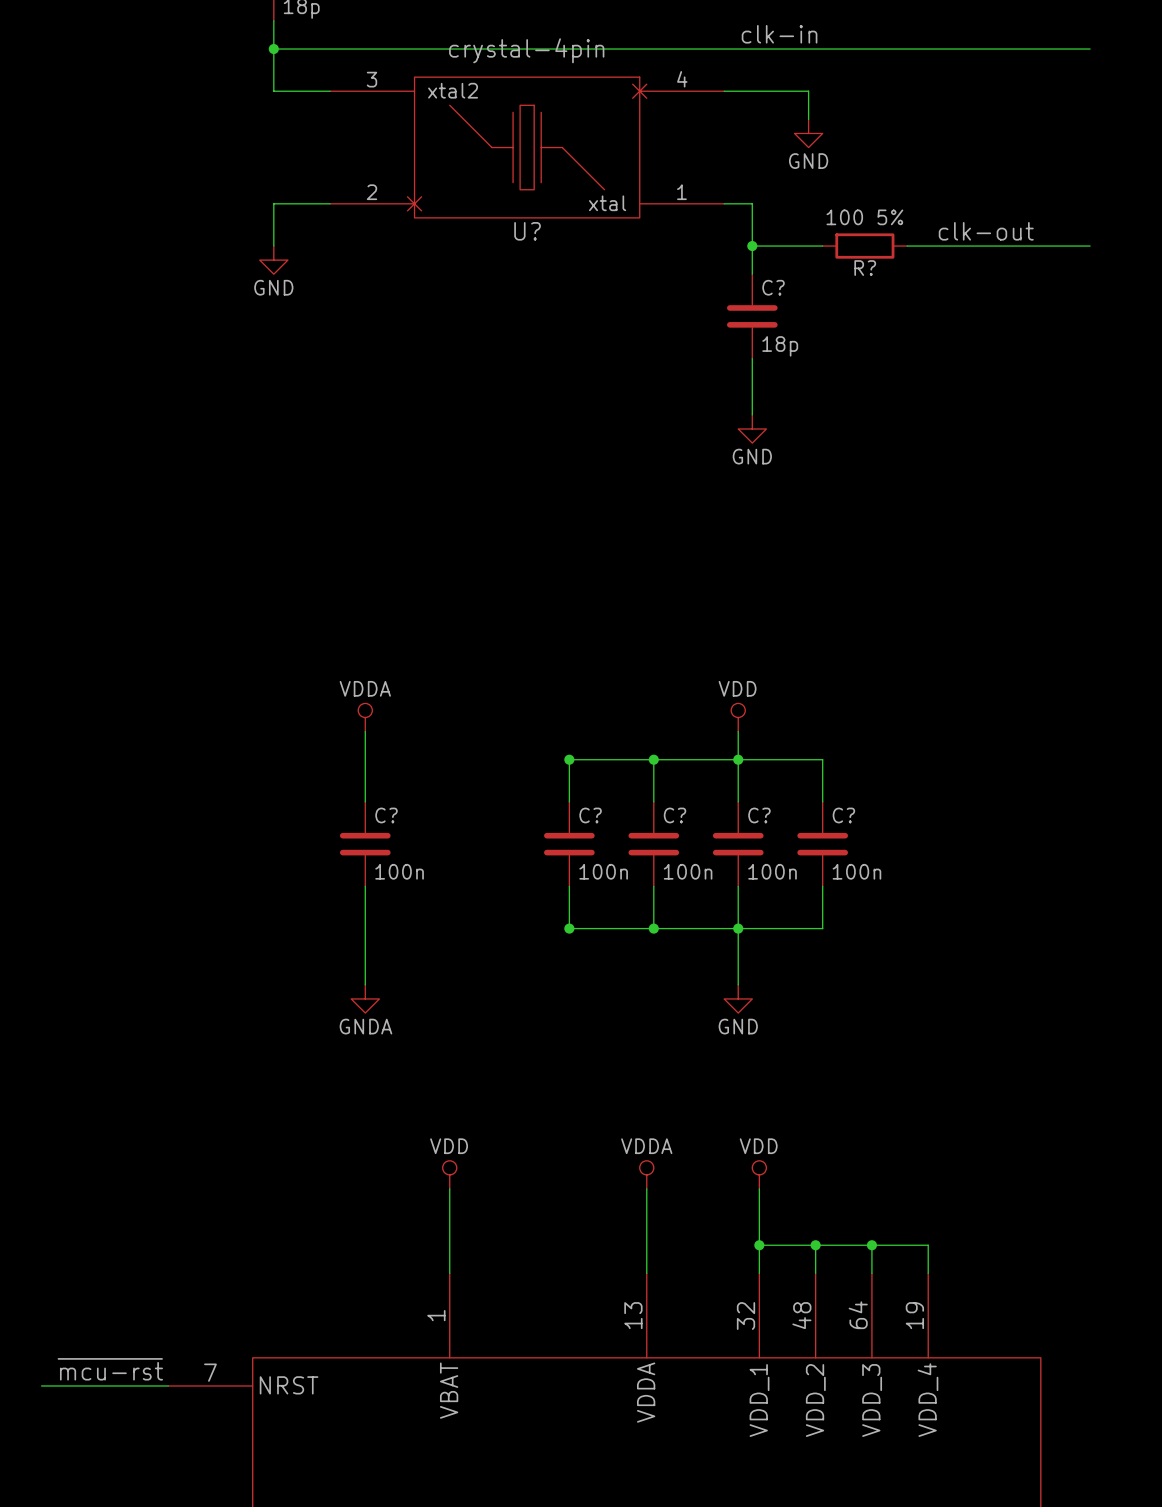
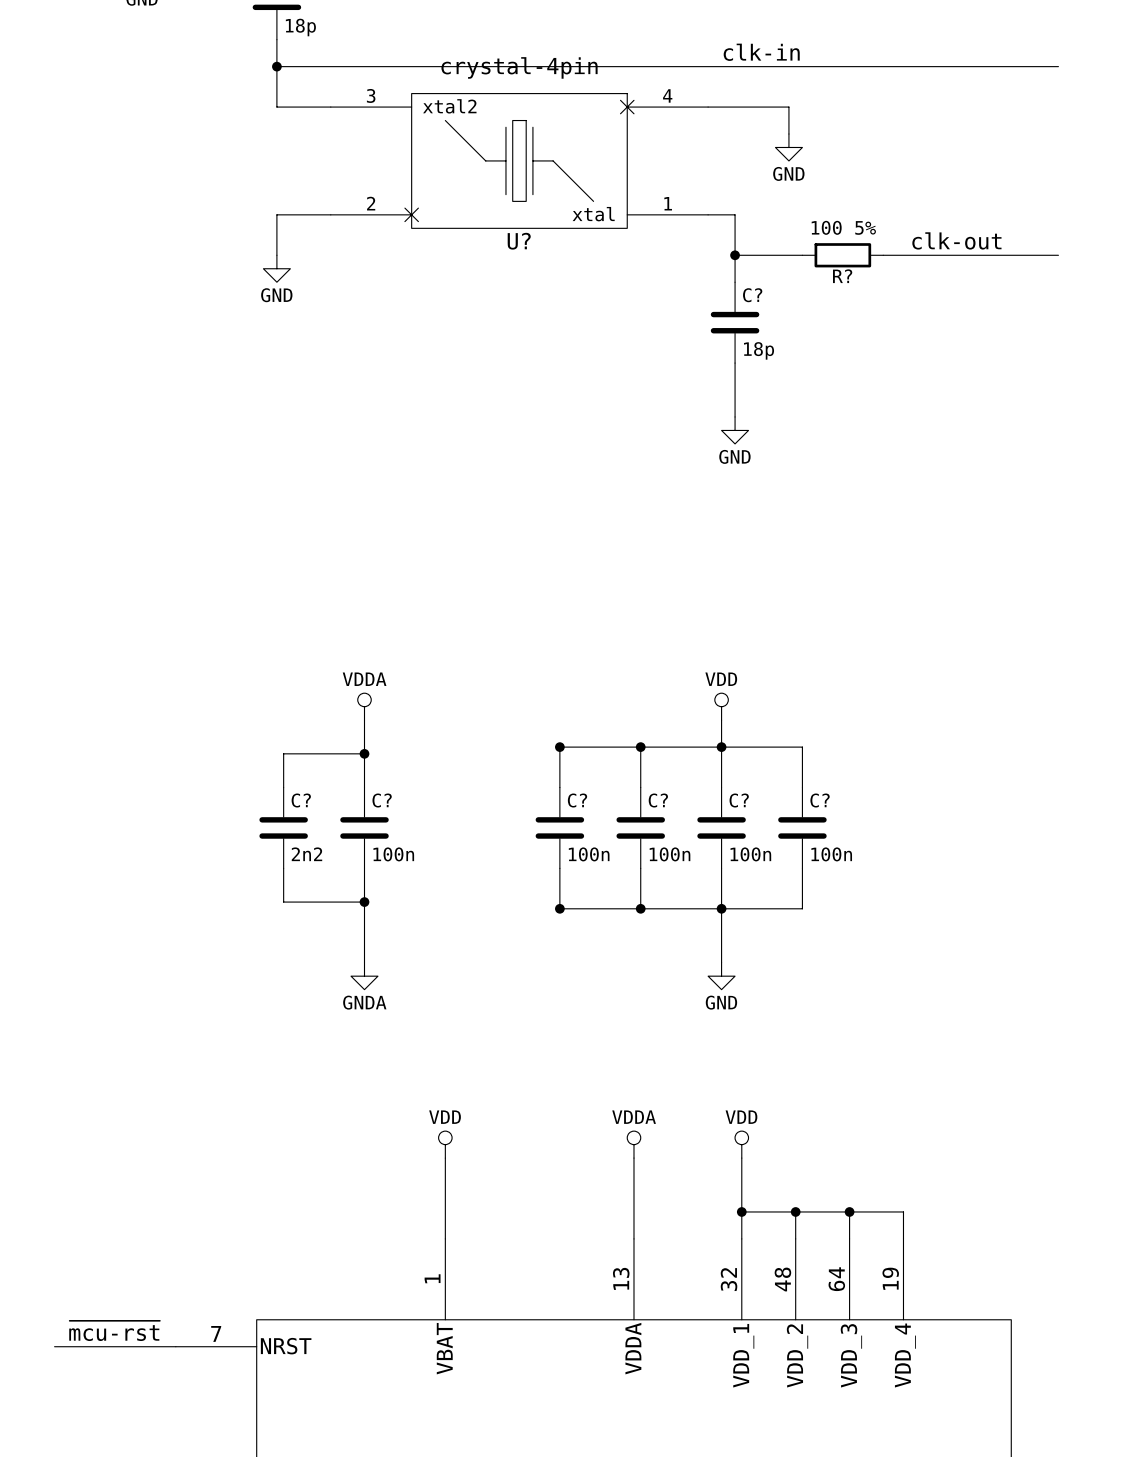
wire: none -> (364, 753) (283, 753) (283, 787)
junction: none -> (364, 753)
C?: none -> 2n2 (283, 827)
wire: none -> (283, 868) (283, 902) (364, 902)
junction: none -> (364, 902)

